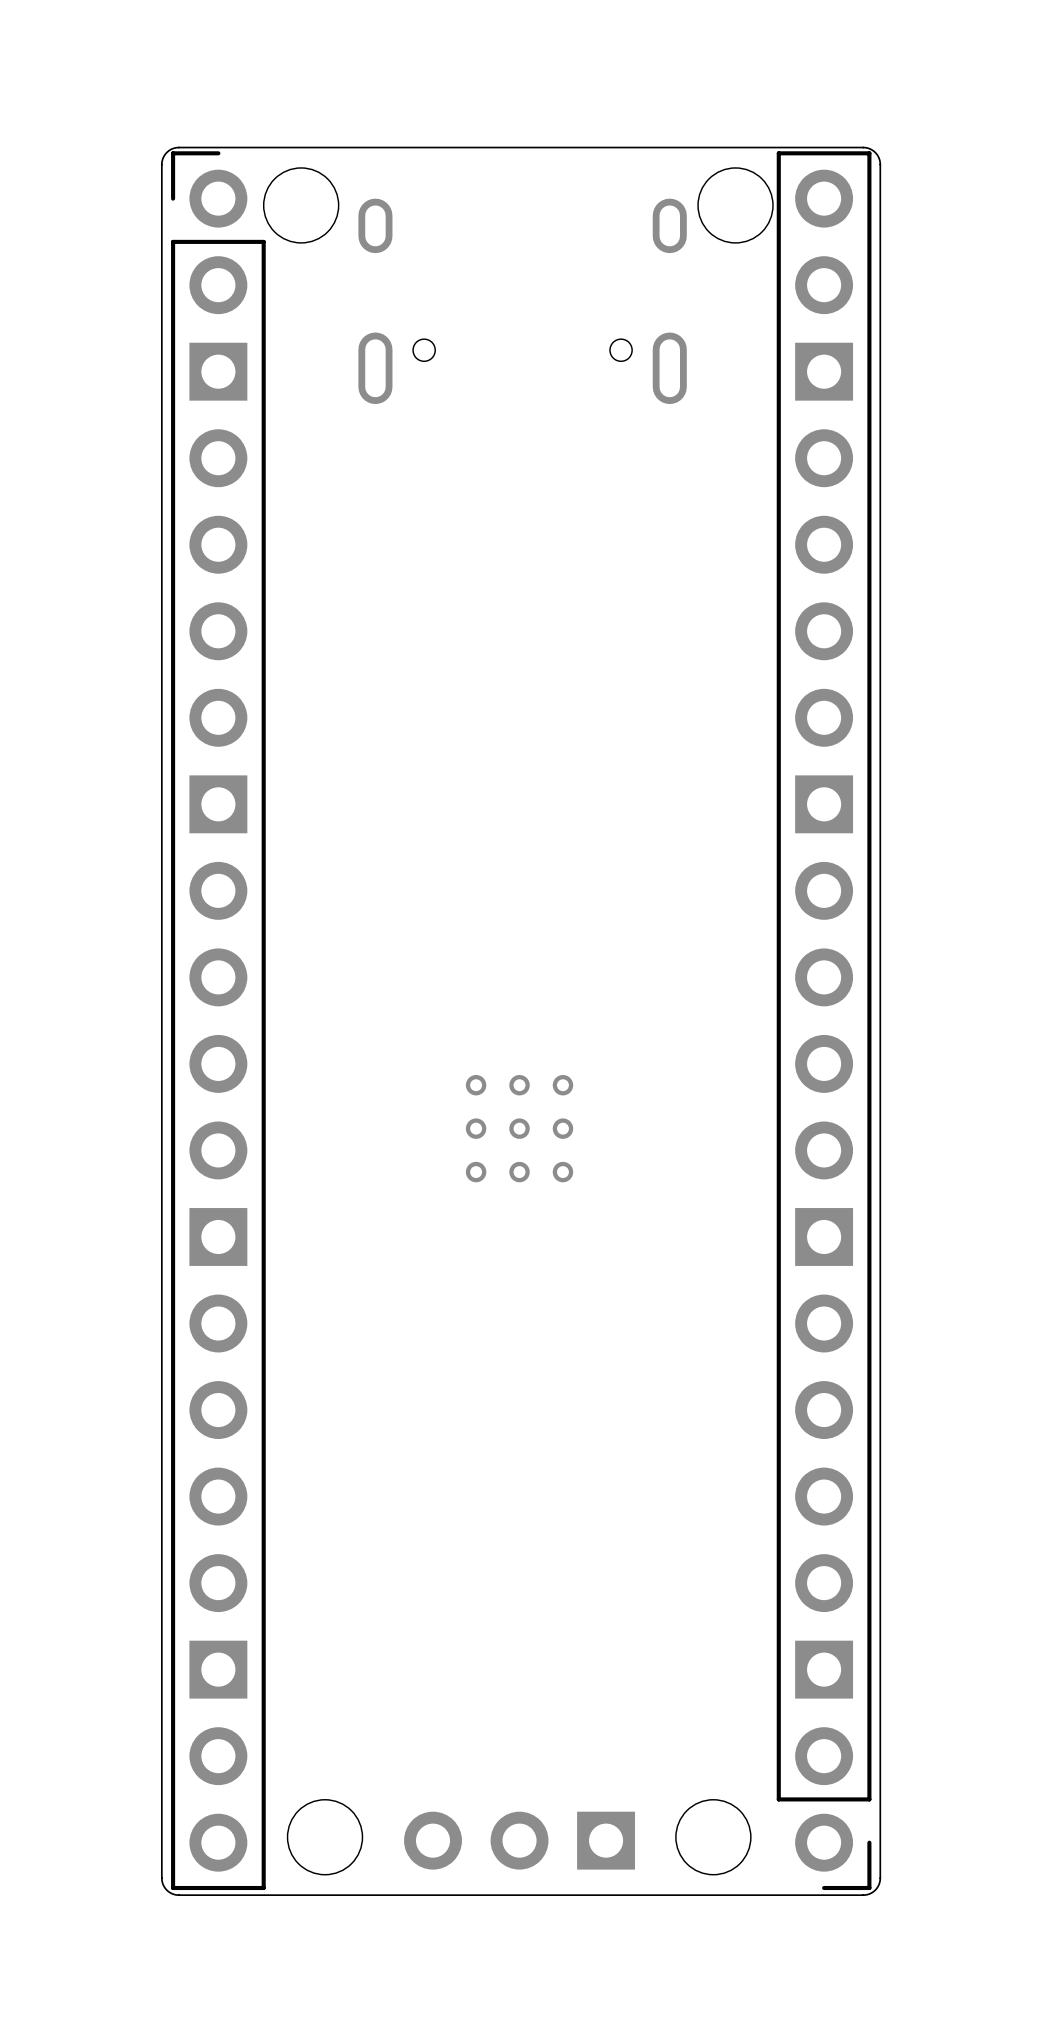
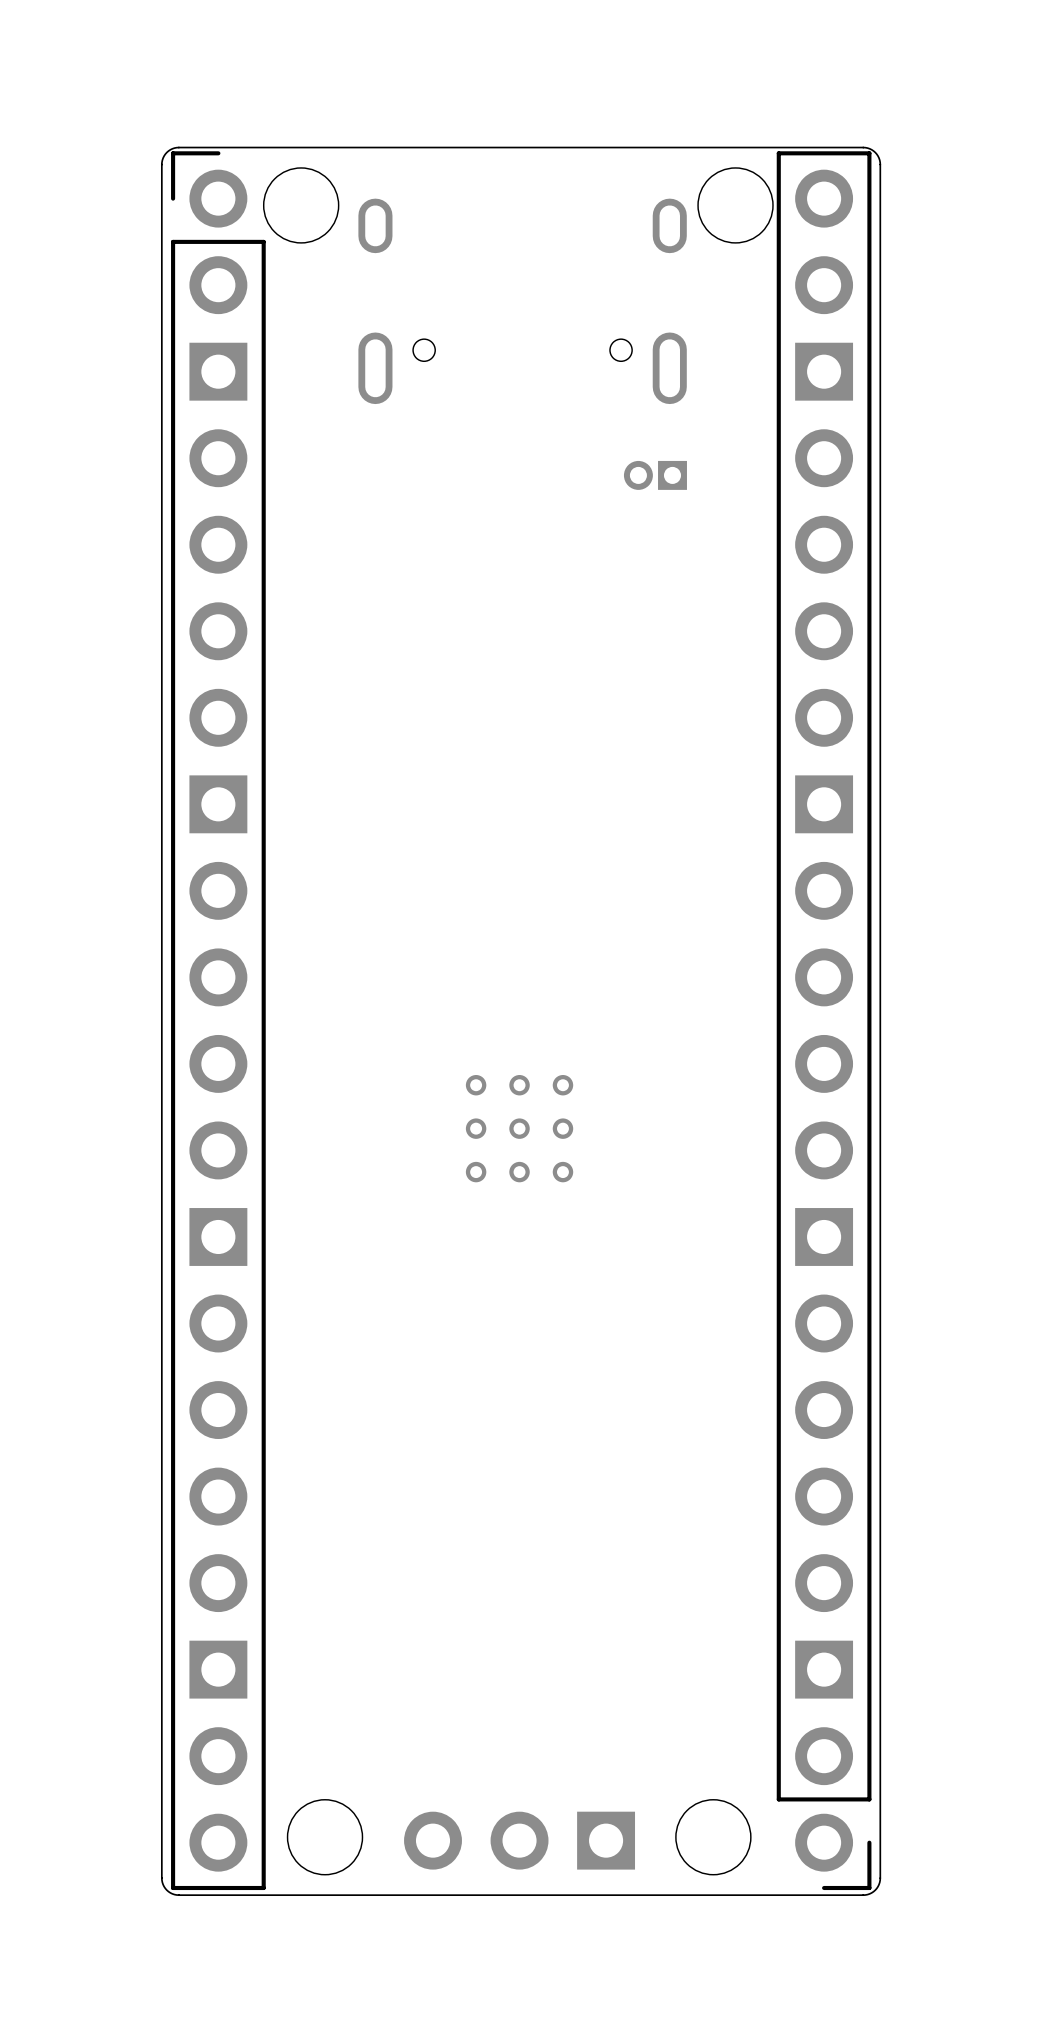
part: none -> (655, 475)

